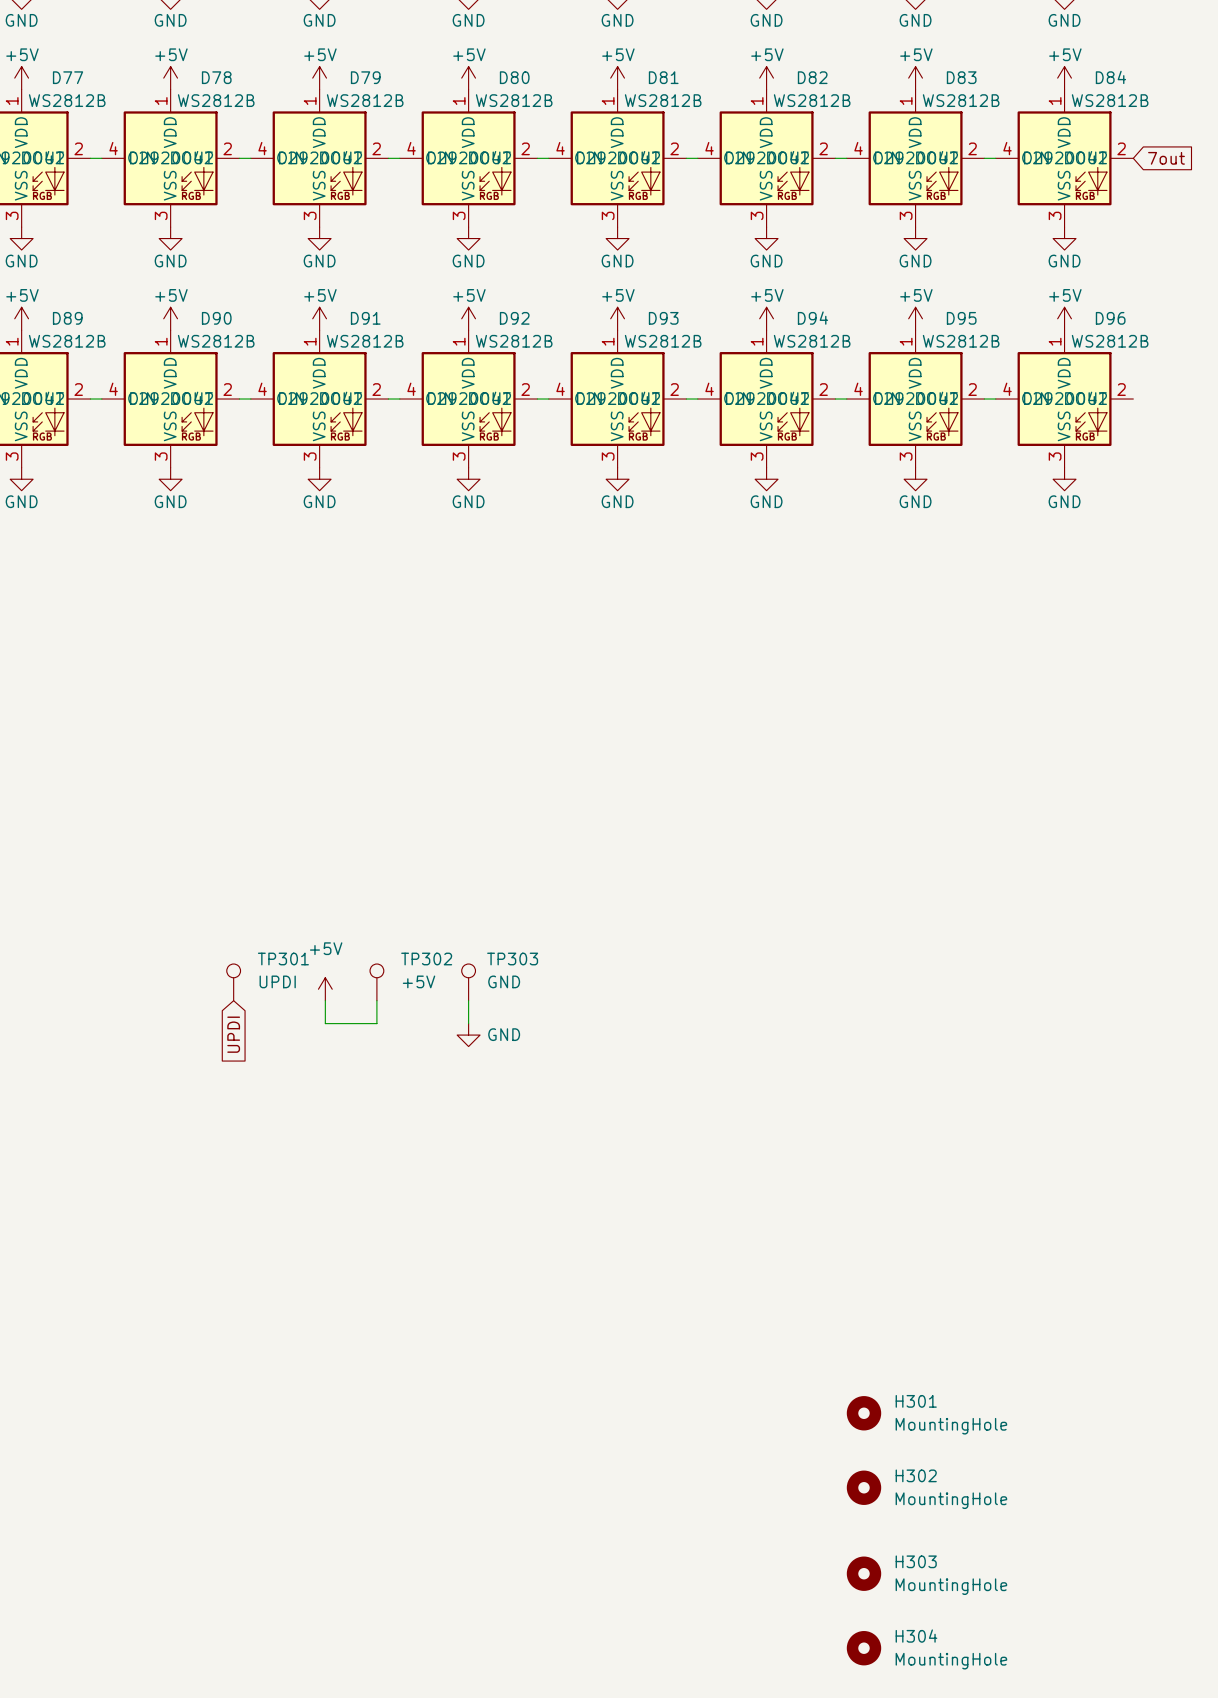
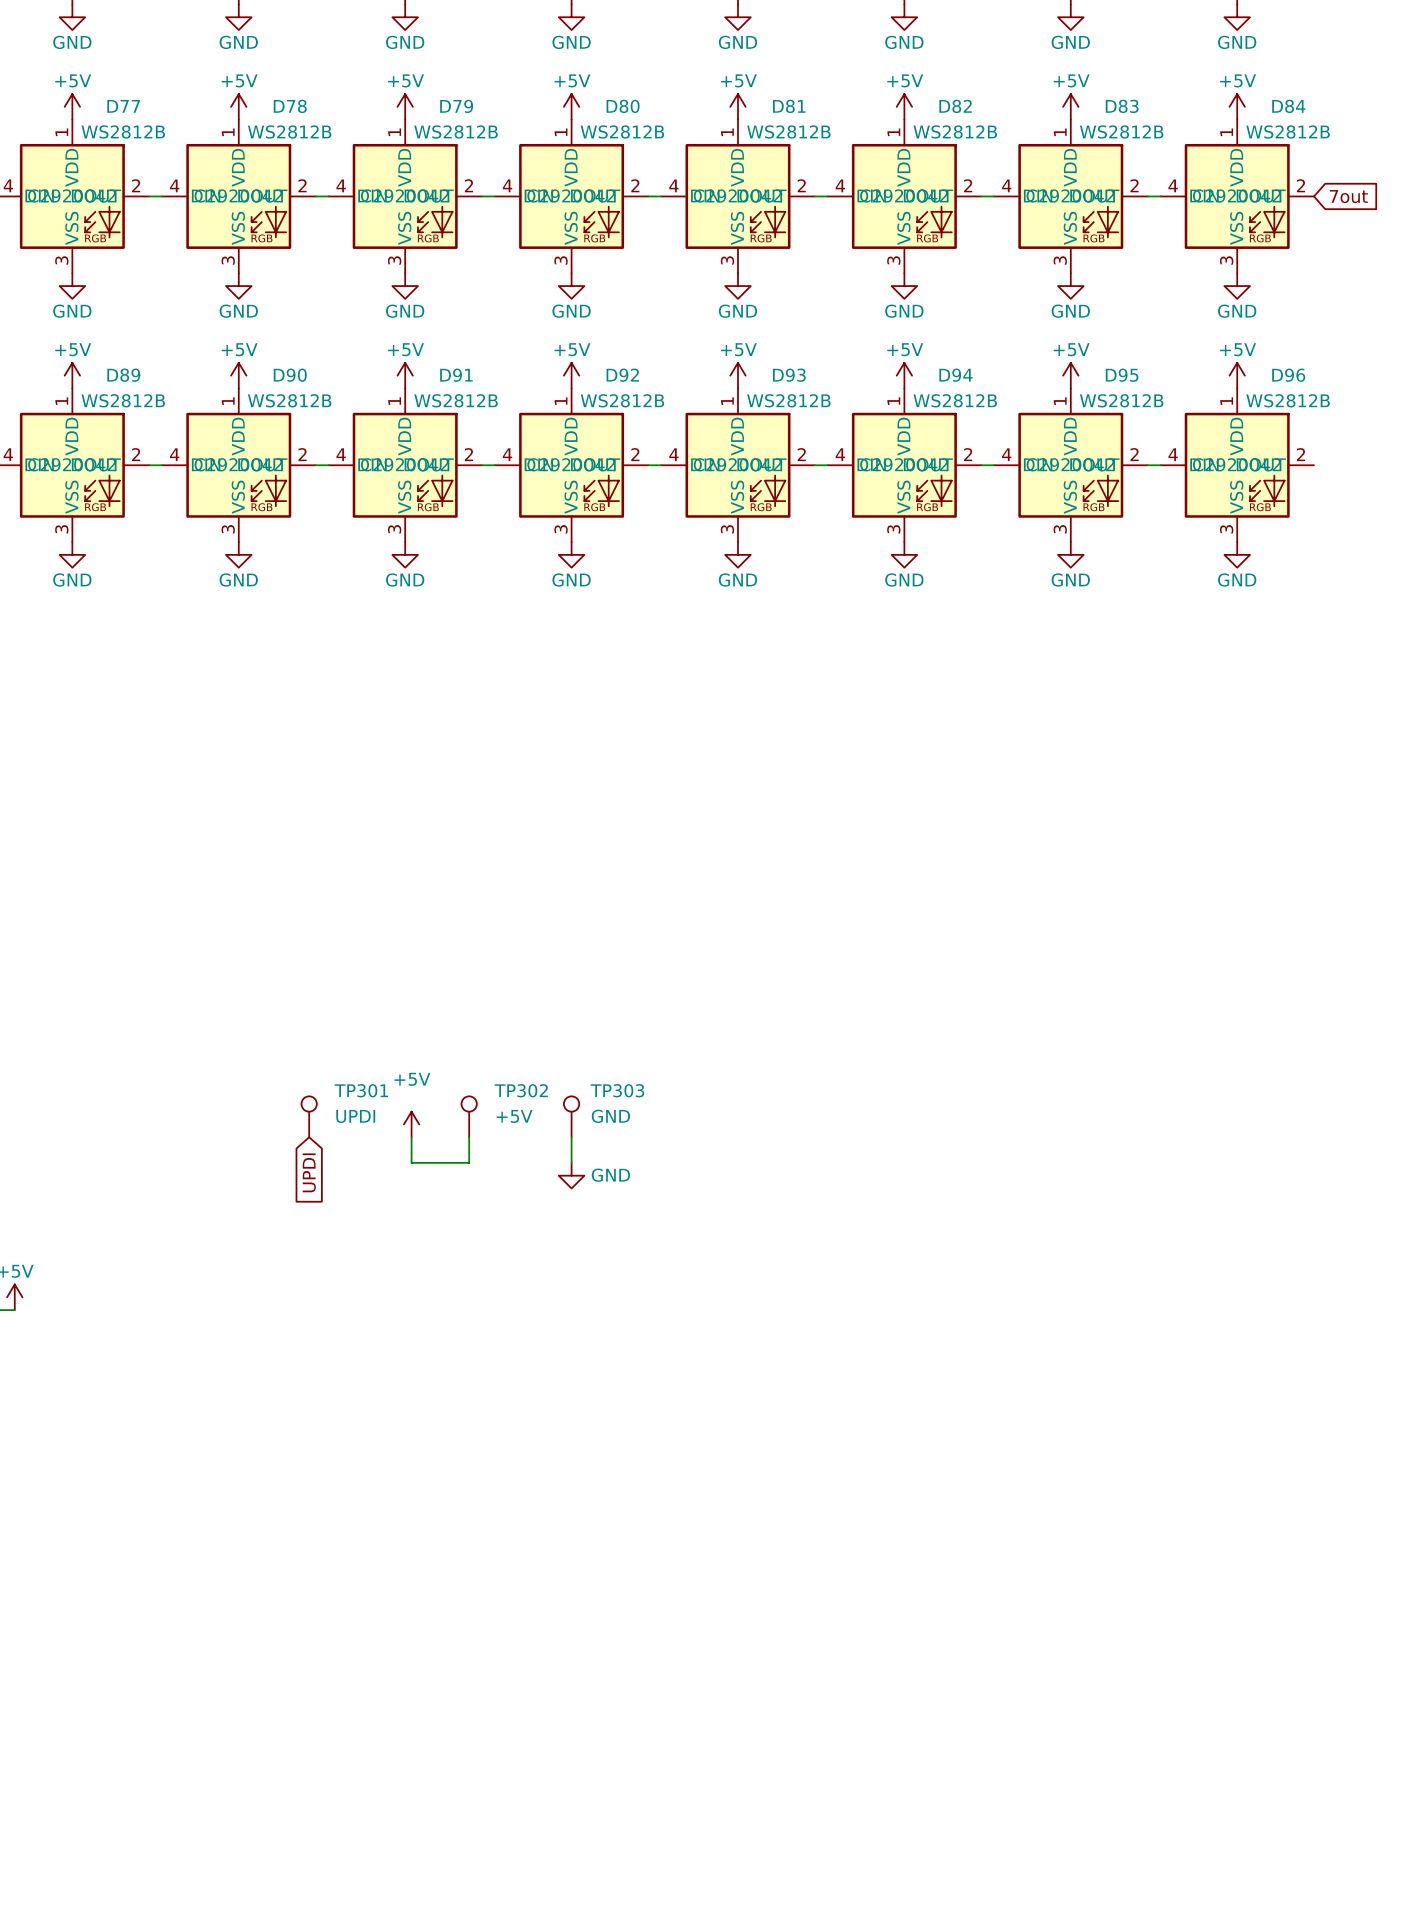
H301: MountingHole (863, 1413) -> none
H302: MountingHole (863, 1487) -> none
H303: MountingHole (863, 1573) -> none
H304: MountingHole (863, 1648) -> none

